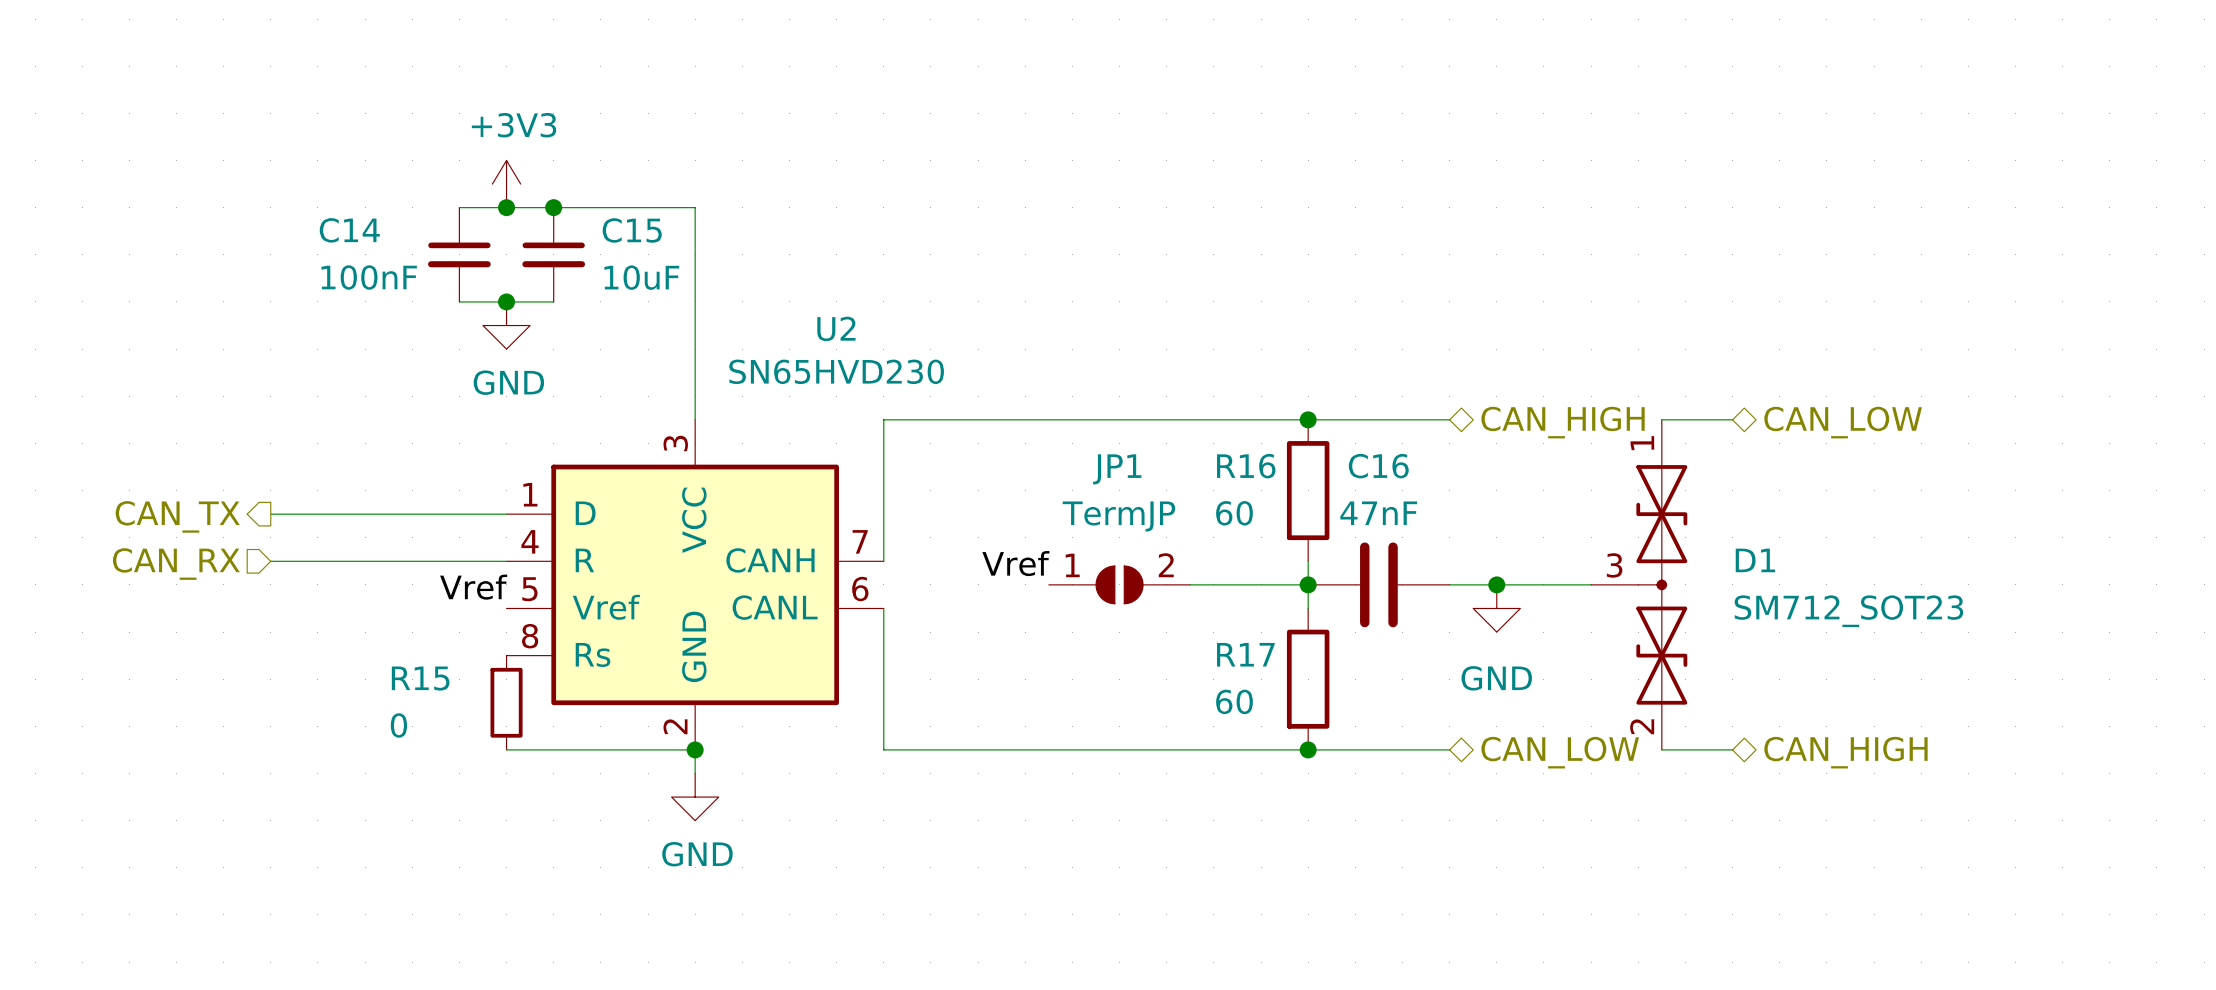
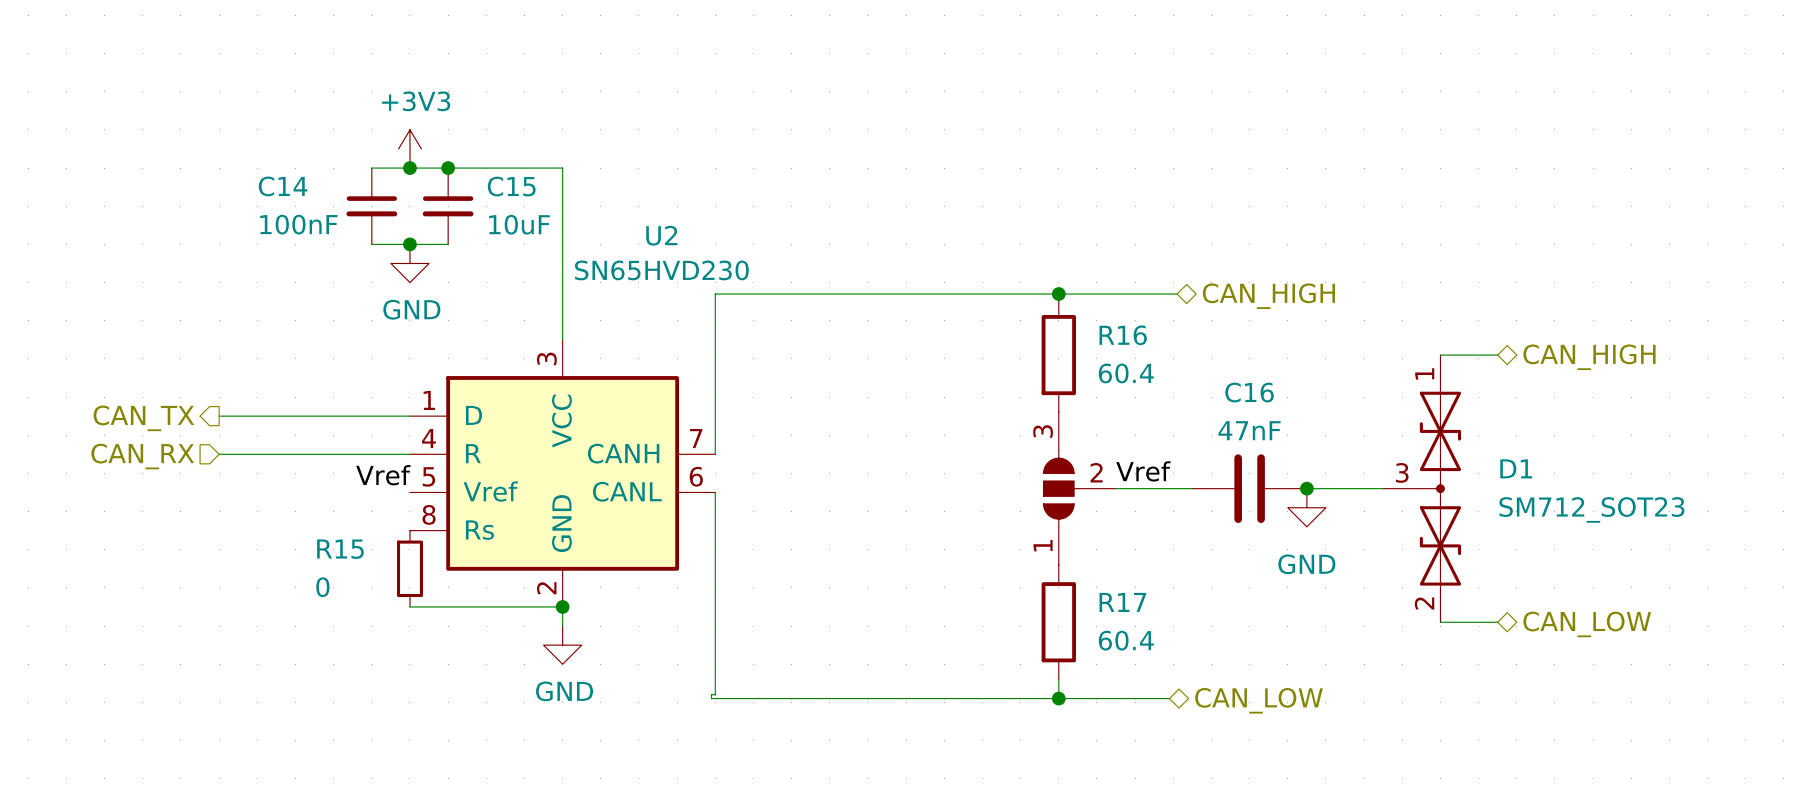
U2 name position: U2 (836, 328) -> U2 (661, 235)
U2 value position: SN65HVD230 (836, 371) -> SN65HVD230 (661, 270)
wire: (883, 419) (1449, 419) -> (715, 339) (715, 294) (1177, 294)
junction position: (1308, 419) -> (1058, 294)
wire: (1661, 419) (1732, 419) -> (1440, 355) (1497, 355)
hierarchical label position: CAN_HIGH (1563, 422) -> CAN_HIGH (1268, 296)
hierarchical label: CAN_LOW (1843, 422) -> none
hierarchical label: none -> CAN_HIGH (1589, 357)
R16 name position: R16 (1246, 466) -> R16 (1123, 335)
R16 position: (1308, 490) -> (1058, 355)
R16 value: 60 (1234, 513) -> 60.4 (1126, 373)
label position: Vref (1015, 563) -> Vref (1143, 471)
JP1: TermJP (1119, 584) -> none
wire: (1190, 584) (1308, 584) -> none
junction: (1308, 584) -> none
C16 position: (1378, 584) -> (1249, 488)
wire: (1449, 584) (1591, 584) -> none
junction: (1496, 584) -> none
D1 position: (1639, 584) -> (1422, 488)
part: none -> (1079, 488)
wire: none -> (1116, 488) (1192, 488)
wire: none -> (1306, 488) (1383, 488)
junction: none -> (1306, 488)
power symbol position: GND (1496, 608) -> GND (1306, 507)
R17 name position: R17 (1245, 654) -> R17 (1122, 602)
R17 position: (1308, 679) -> (1058, 622)
R17 value: 60 (1234, 701) -> 60.4 (1126, 640)
wire: (883, 749) (1449, 749) -> (715, 606) (715, 694) (711, 694) (711, 698) (1169, 698)
junction: (1308, 749) -> none
wire: (1661, 749) (1732, 749) -> (1440, 622) (1497, 622)
hierarchical label position: CAN_LOW (1560, 752) -> CAN_LOW (1258, 700)
hierarchical label: CAN_HIGH (1845, 752) -> none
hierarchical label: none -> CAN_LOW (1587, 624)
wire: none -> (1058, 679) (1058, 698)
junction: none -> (1058, 698)

